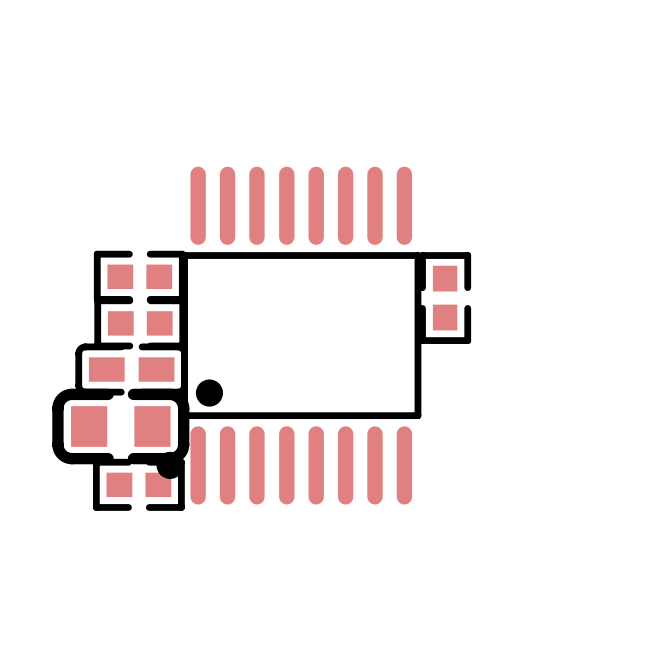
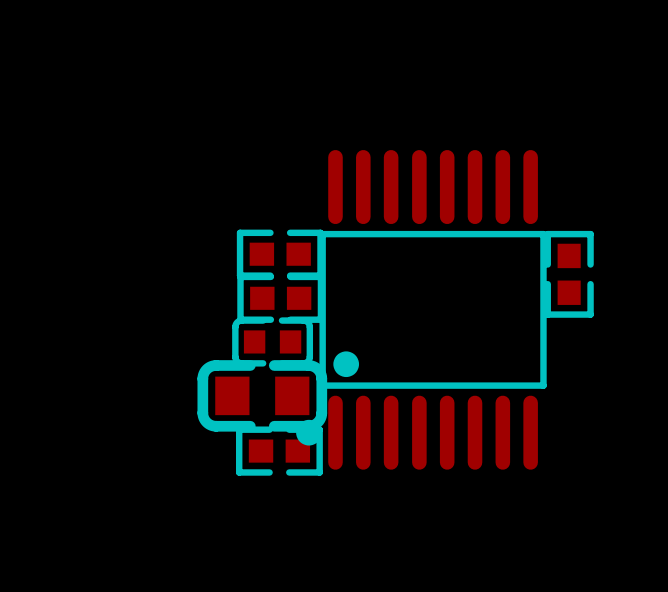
part footprint: [75, 343, 188, 396] -> [232, 317, 314, 367]

